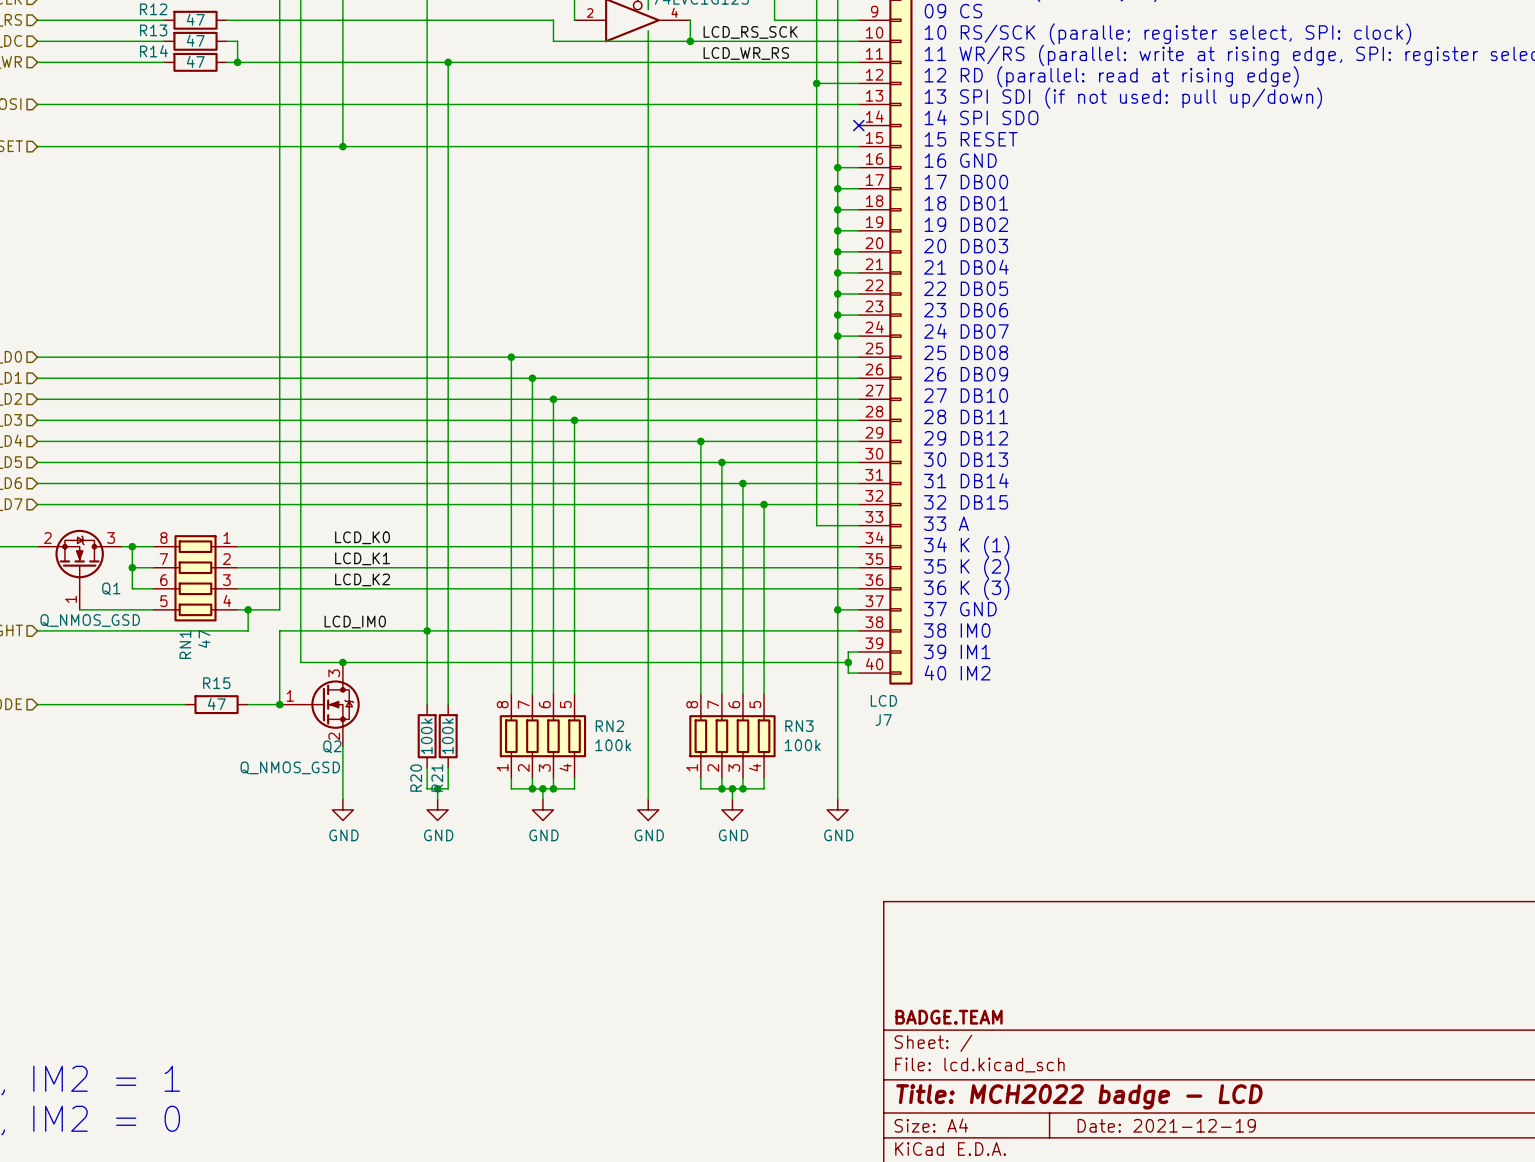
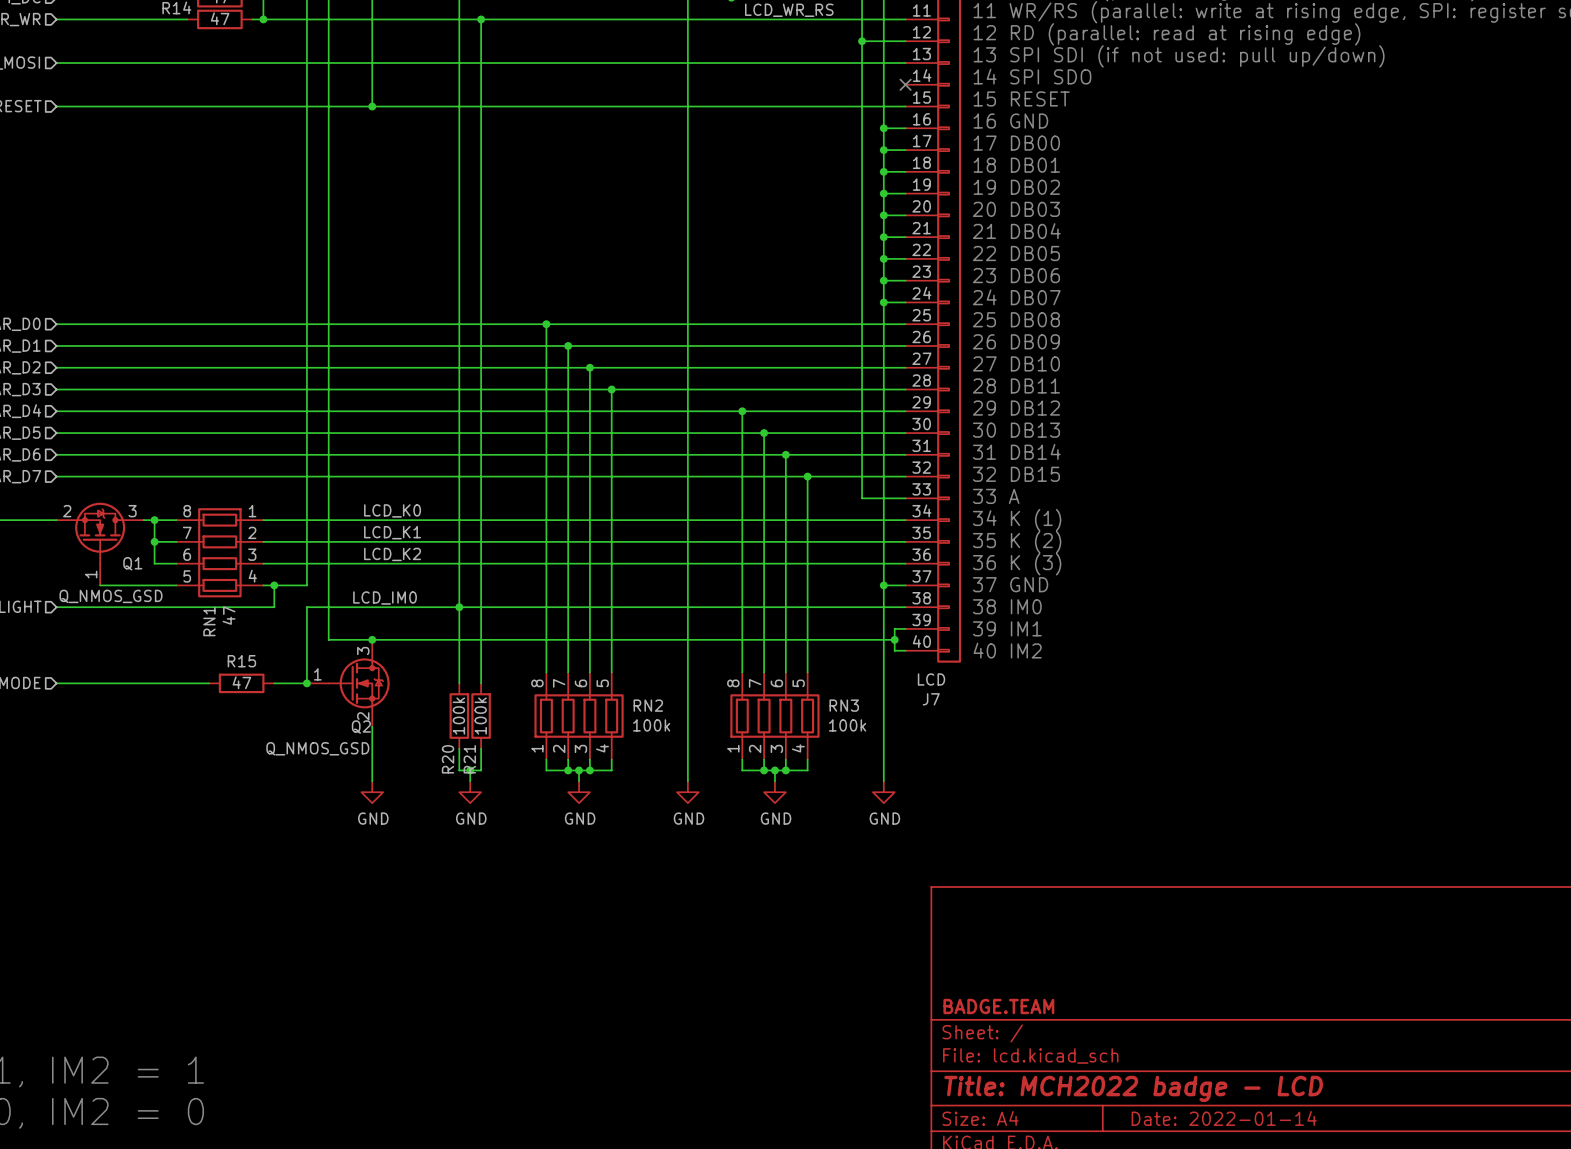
title block: Date: 2021-12-19 (1166, 1125) -> Date: 2022-01-14 (1224, 1118)

